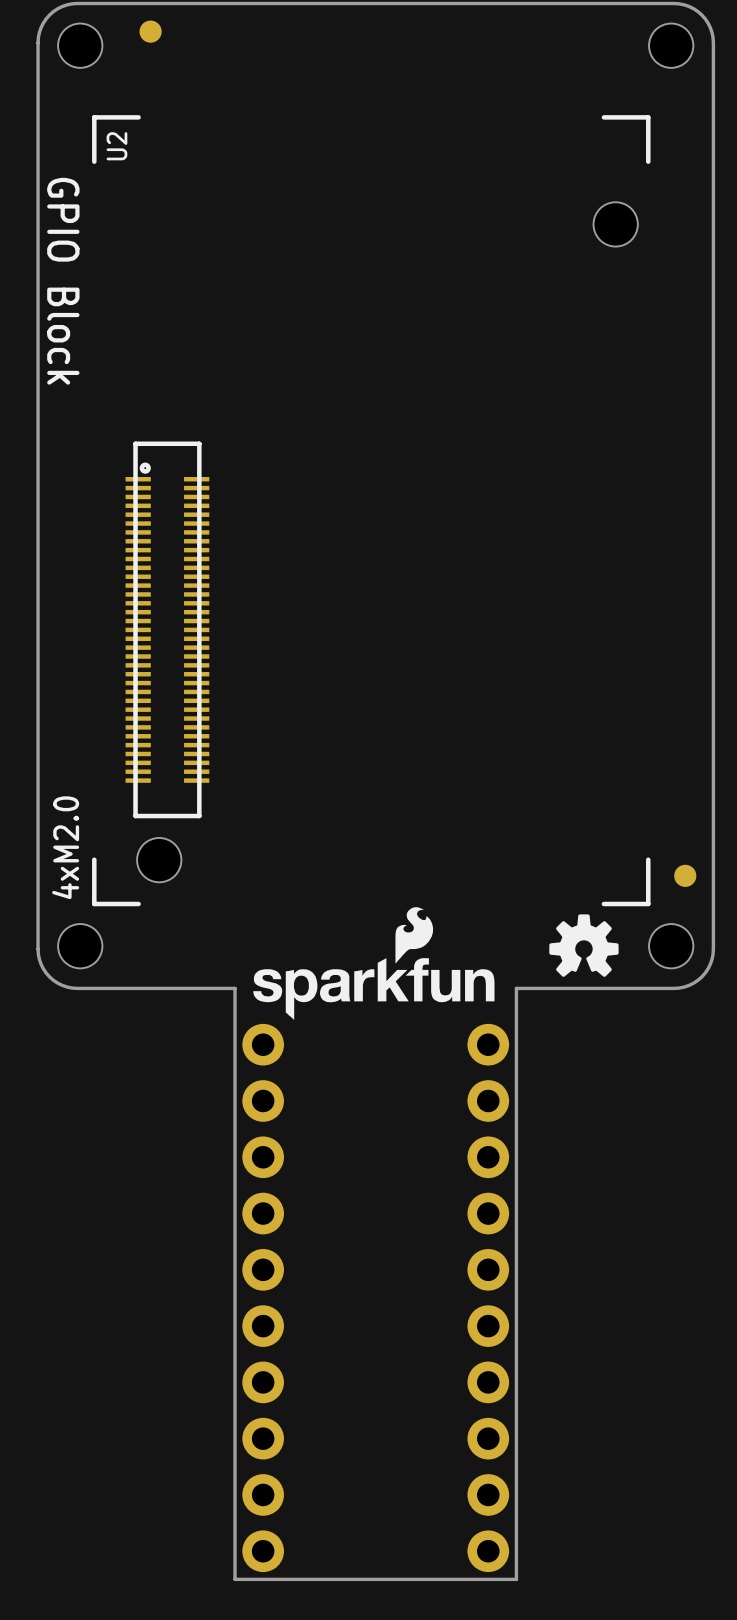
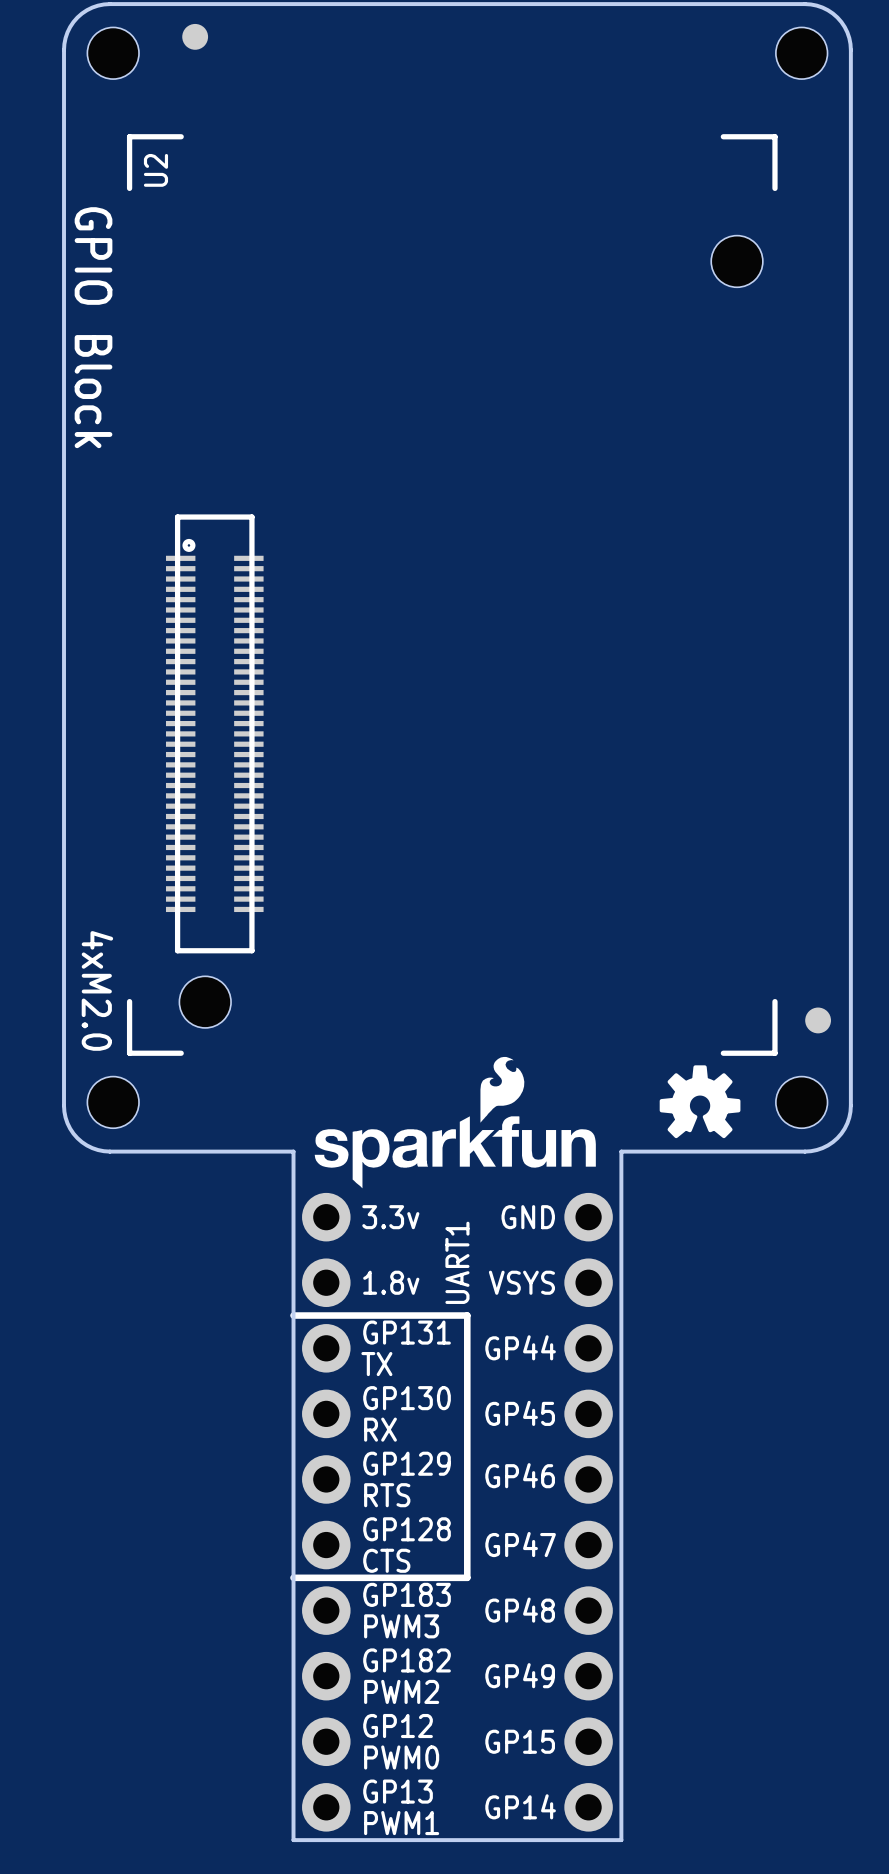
text rotation: 0° (65, 847) -> 180° (97, 990)
text: none -> 3.3v (390, 1217)
text: none -> GND (528, 1217)
text: none -> UART1 (457, 1262)
text: none -> 1.8v (391, 1282)
text: none -> VSYS (521, 1282)
line: none -> (293, 1315) (467, 1315) (467, 1577) (293, 1577)
text: none -> GP131 (407, 1332)
text: none -> GP44 (520, 1347)
text: none -> TX (376, 1364)
text: none -> GP130 (407, 1398)
text: none -> GP45 (520, 1413)
text: none -> RX (380, 1429)
text: none -> GP129 (407, 1463)
text: none -> GP46 (520, 1475)
text: none -> RTS (387, 1495)
text: none -> GP128 (407, 1529)
text: none -> GP47 (520, 1544)
text: none -> CTS (386, 1560)
text: none -> GP183 (407, 1594)
text: none -> GP48 (520, 1610)
text: none -> PWM3 (401, 1626)
text: none -> GP182 (407, 1660)
text: none -> GP49 (520, 1675)
text: none -> PWM2 (401, 1691)
text: none -> GP12 (398, 1726)
text: none -> GP15 (520, 1741)
text: none -> PWM0 (401, 1757)
text: none -> GP13 (398, 1791)
text: none -> GP14 (520, 1806)
text: none -> PWM1 (401, 1823)

